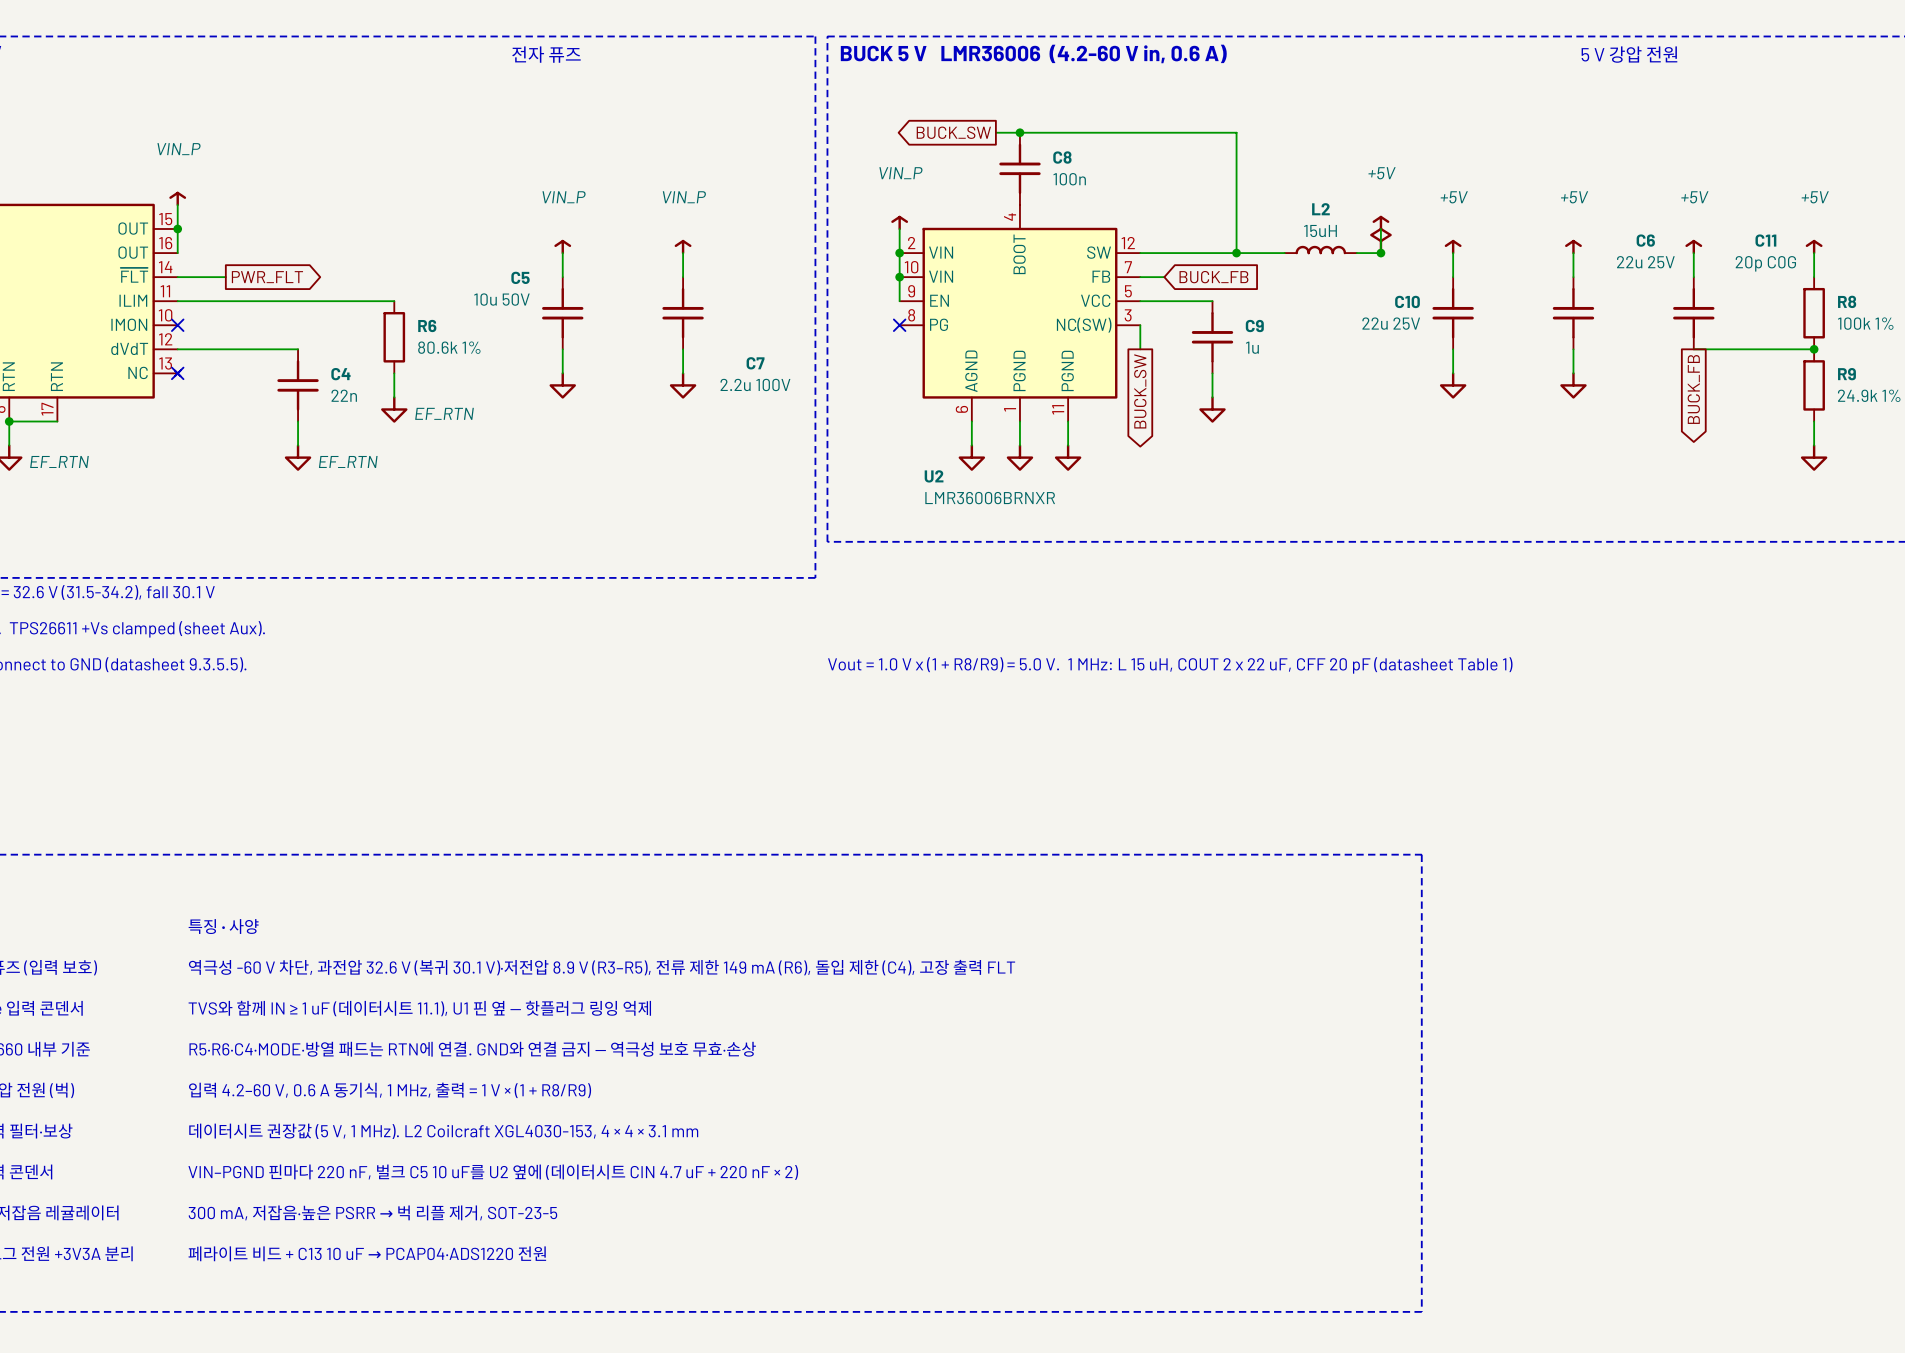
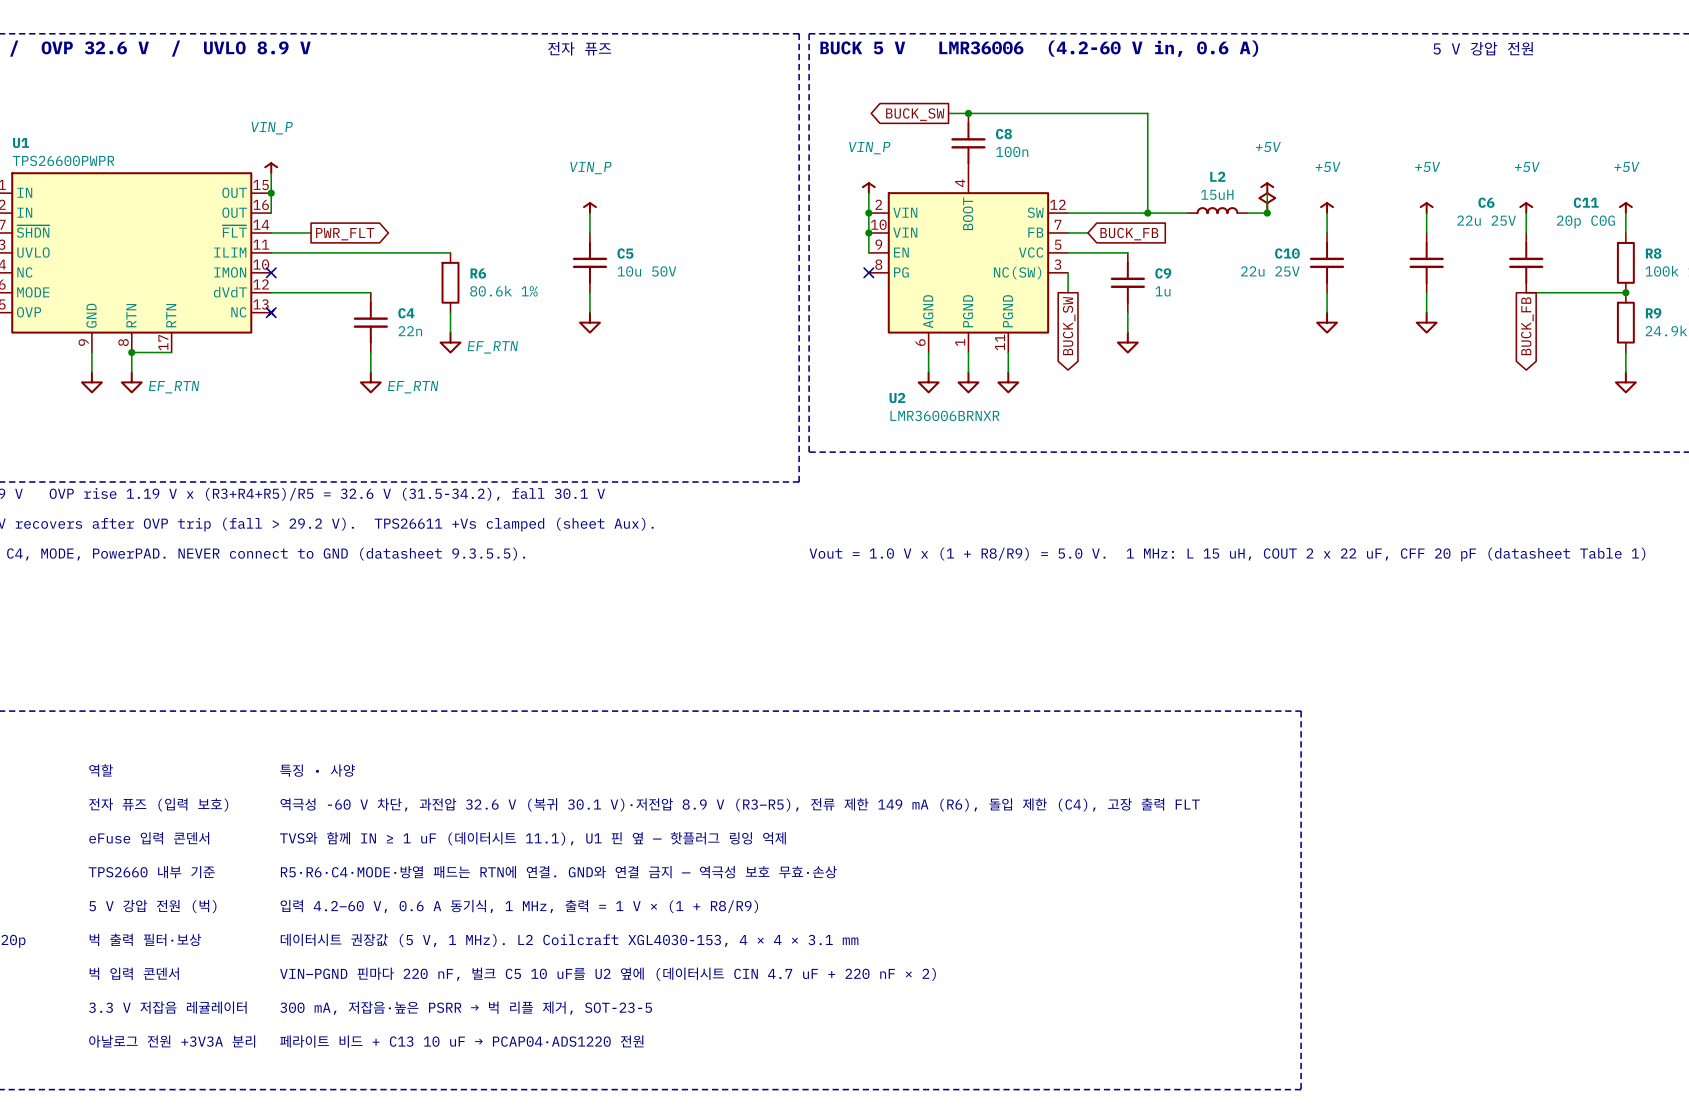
power symbol: VIN_P (683, 247) -> none
wire: (683, 253) (683, 277) -> none
C5 name position: C5 (520, 277) -> C5 (625, 253)
C5 value position: 10u 50V (501, 299) -> 10u 50V (646, 271)
C7: 2.2u 100V (683, 313) -> none
wire: (683, 349) (683, 373) -> none
power symbol: (683, 385) -> none

